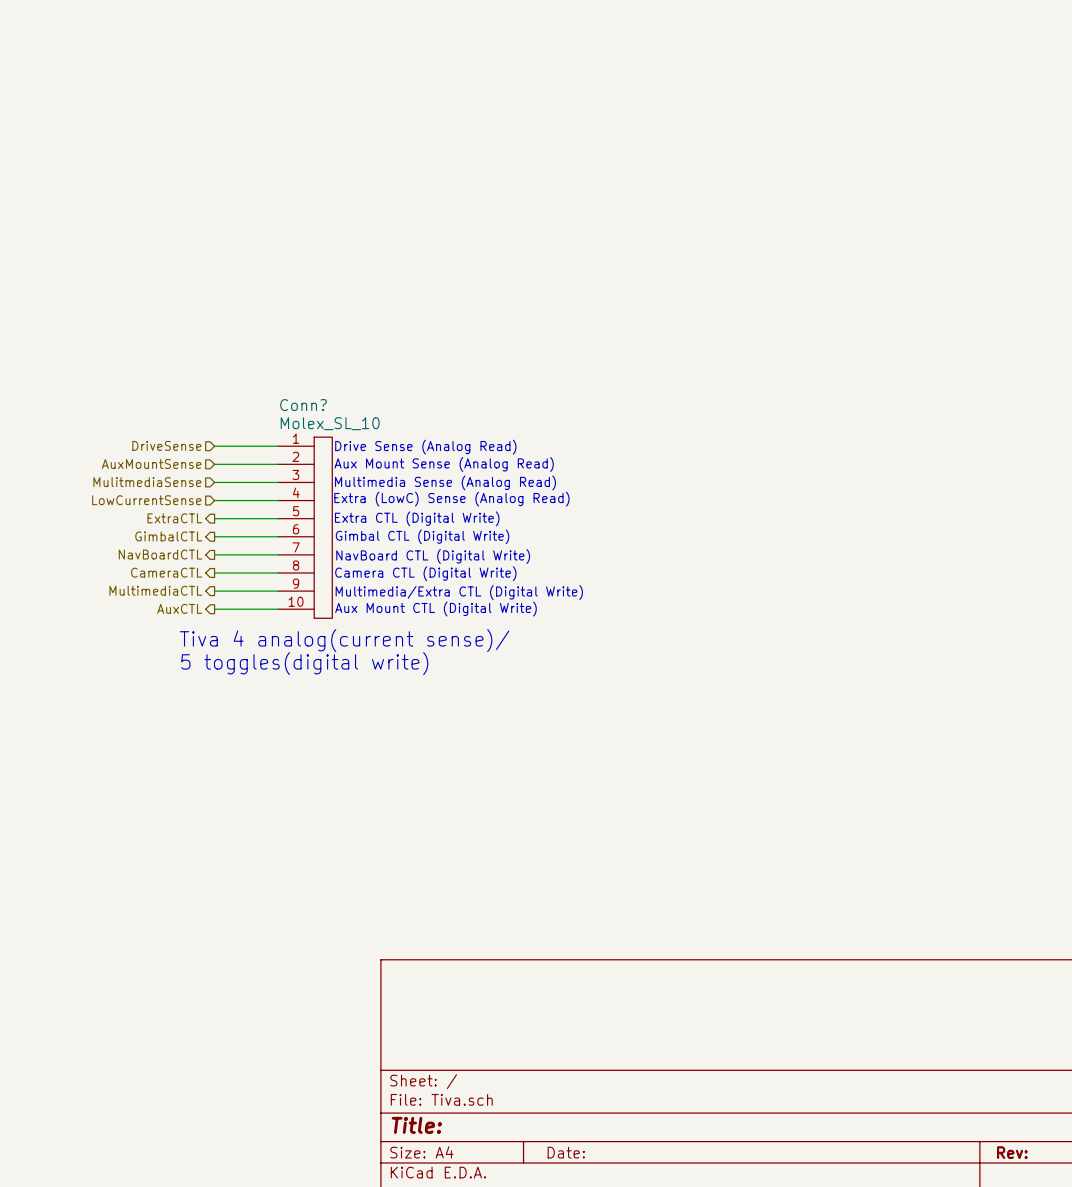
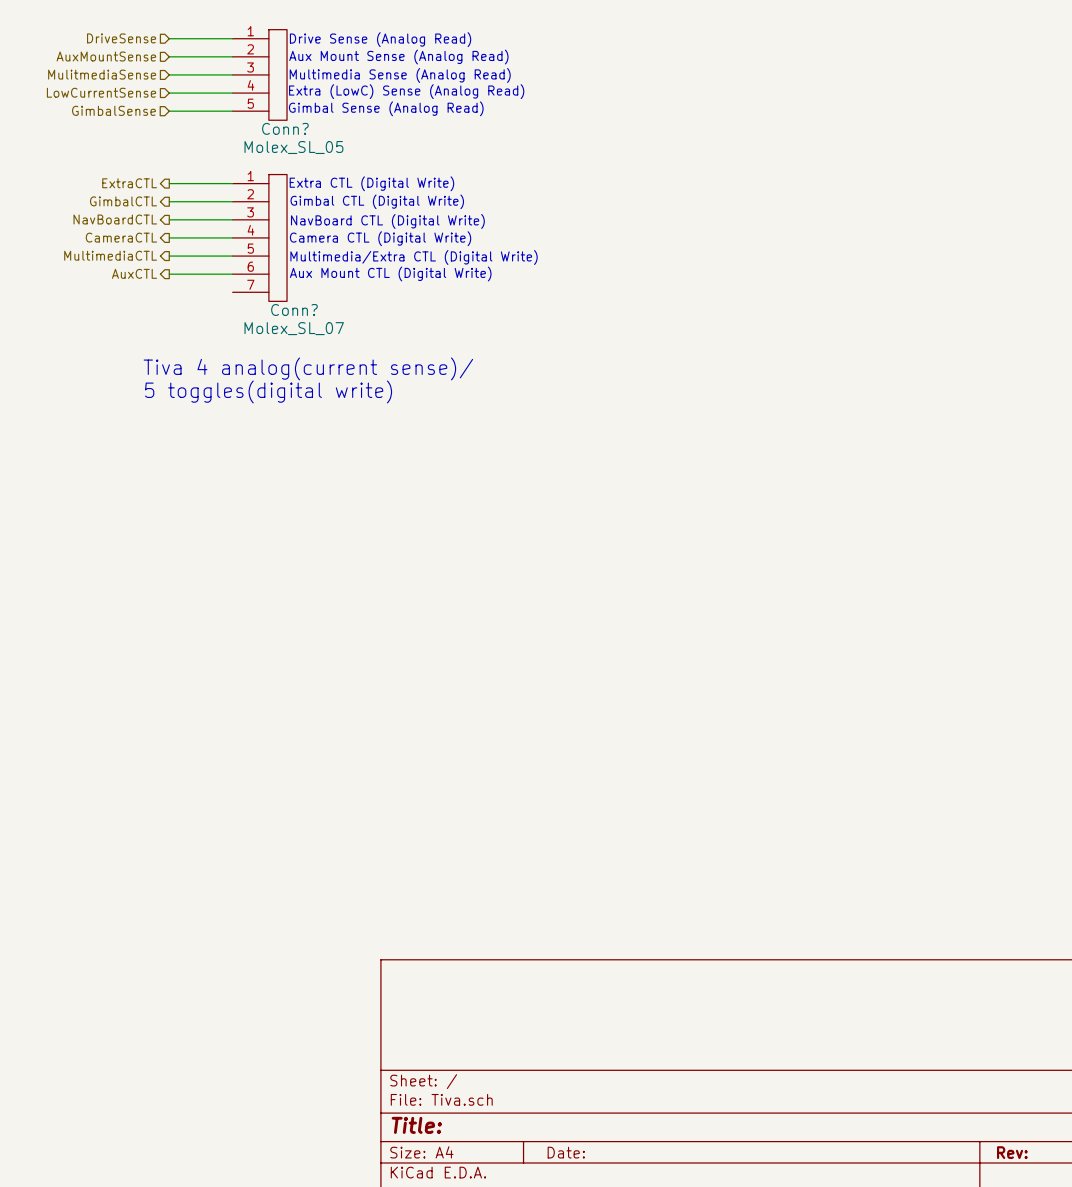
hierarchical label: none -> DriveSense (121, 38)
wire: none -> (169, 38) (232, 38)
text: none -> Drive Sense (Analog Read) (380, 39)
hierarchical label: none -> AuxMountSense (106, 56)
wire: none -> (169, 56) (232, 56)
text: none -> Aux Mount Sense (Analog Read) (398, 57)
hierarchical label: none -> MulitmediaSense (102, 74)
wire: none -> (169, 74) (232, 74)
Conn?: none -> Molex_SL_05 (259, 74)
text: none -> Multimedia Sense (Analog Read) (400, 75)
text: none -> Extra (LowC) Sense (Analog Read) (406, 91)
hierarchical label: none -> LowCurrentSense (101, 92)
wire: none -> (169, 93) (232, 93)
text: none -> Gimbal Sense (Analog Read) (386, 108)
hierarchical label: none -> GimbalSense (113, 110)
wire: none -> (169, 111) (232, 111)
hierarchical label: none -> ExtraCTL (129, 183)
wire: none -> (169, 183) (232, 183)
text: none -> Extra CTL (Digital Write) (371, 183)
hierarchical label: none -> GimbalCTL (123, 201)
wire: none -> (169, 201) (232, 201)
text: none -> Gimbal CTL (Digital Write) (377, 201)
hierarchical label: none -> NavBoardCTL (115, 219)
wire: none -> (169, 219) (232, 219)
text: none -> NavBoard CTL (Digital Write) (387, 221)
hierarchical label: none -> CameraCTL (121, 237)
wire: none -> (169, 237) (232, 237)
Conn?: none -> Molex_SL_07 (259, 237)
text: none -> Camera CTL (Digital Write) (380, 238)
hierarchical label: none -> MultimediaCTL (110, 255)
wire: none -> (169, 256) (232, 256)
text: none -> Multimedia/Extra CTL (Digital Write) (414, 257)
hierarchical label: none -> AuxCTL (134, 273)
text: none -> Aux Mount CTL (Digital Write) (390, 273)
text: none -> Tiva 4 analog(current sense)/ (308, 368)
text: none -> 5 toggles(digital write) (268, 391)
hierarchical label: DriveSense (166, 445) -> none
wire: (214, 446) (277, 446) -> (169, 274) (232, 274)
text: Drive Sense (Analog Read) (425, 447) -> none
hierarchical label: AuxMountSense (151, 464) -> none
wire: (214, 464) (277, 464) -> none
text: Aux Mount Sense (Analog Read) (444, 464) -> none
hierarchical label: MulitmediaSense (147, 482) -> none
wire: (214, 482) (277, 482) -> none
text: Multimedia Sense (Analog Read) (445, 482) -> none
text: Extra (LowC) Sense (Analog Read) (451, 499) -> none
hierarchical label: LowCurrentSense (146, 500) -> none
wire: (214, 500) (277, 500) -> none
hierarchical label: ExtraCTL (174, 518) -> none
wire: (214, 518) (277, 518) -> none
text: Extra CTL (Digital Write) (417, 518) -> none
Conn?: Molex_SL_10 (305, 527) -> none
hierarchical label: GimbalCTL (168, 536) -> none
wire: (214, 536) (277, 536) -> none
text: Gimbal CTL (Digital Write) (422, 536) -> none
hierarchical label: NavBoardCTL (160, 554) -> none
wire: (214, 554) (277, 554) -> none
text: NavBoard CTL (Digital Write) (433, 556) -> none
hierarchical label: CameraCTL (166, 572) -> none
wire: (214, 572) (277, 572) -> none
text: Camera CTL (Digital Write) (425, 573) -> none
hierarchical label: MultimediaCTL (155, 590) -> none
wire: (214, 591) (277, 591) -> none
text: Multimedia/Extra CTL (Digital Write) (459, 592) -> none
hierarchical label: AuxCTL (179, 608) -> none
wire: (214, 609) (277, 609) -> none
text: Aux Mount CTL (Digital Write) (435, 609) -> none
text: Tiva 4 analog(current sense)/ (344, 640) -> none
text: 5 toggles(digital write) (304, 663) -> none

